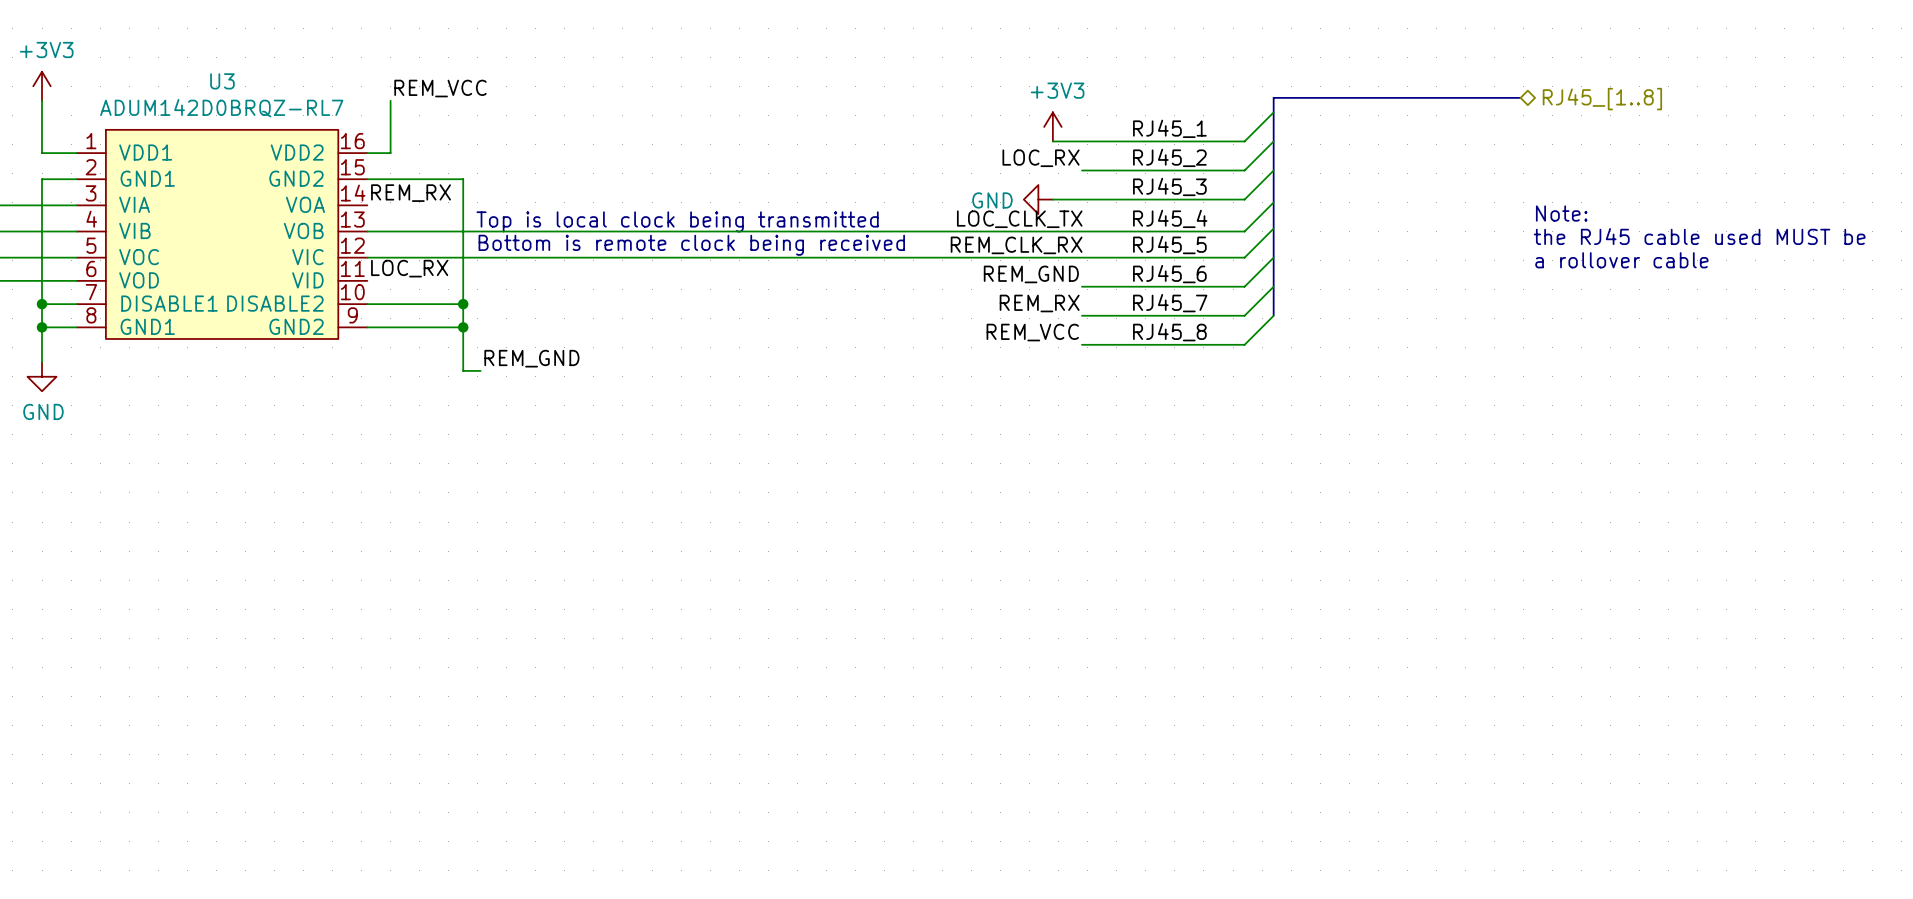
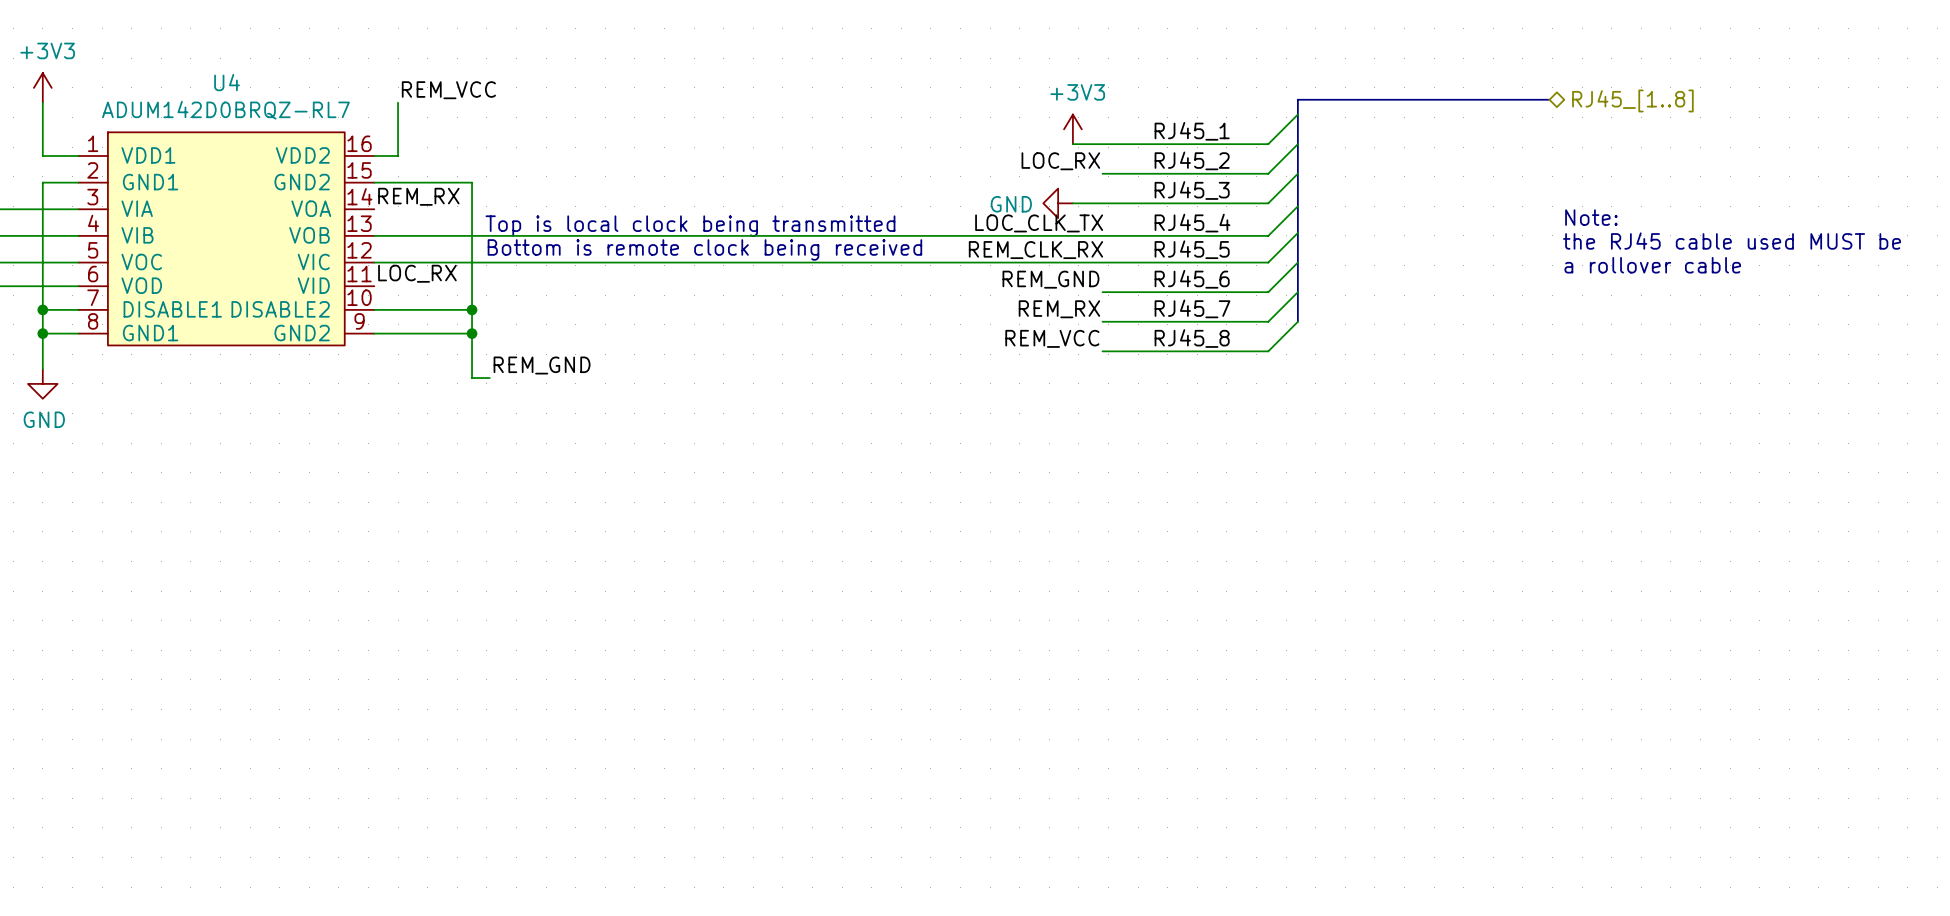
U3 name: U3 (222, 81) -> U4 (227, 82)

